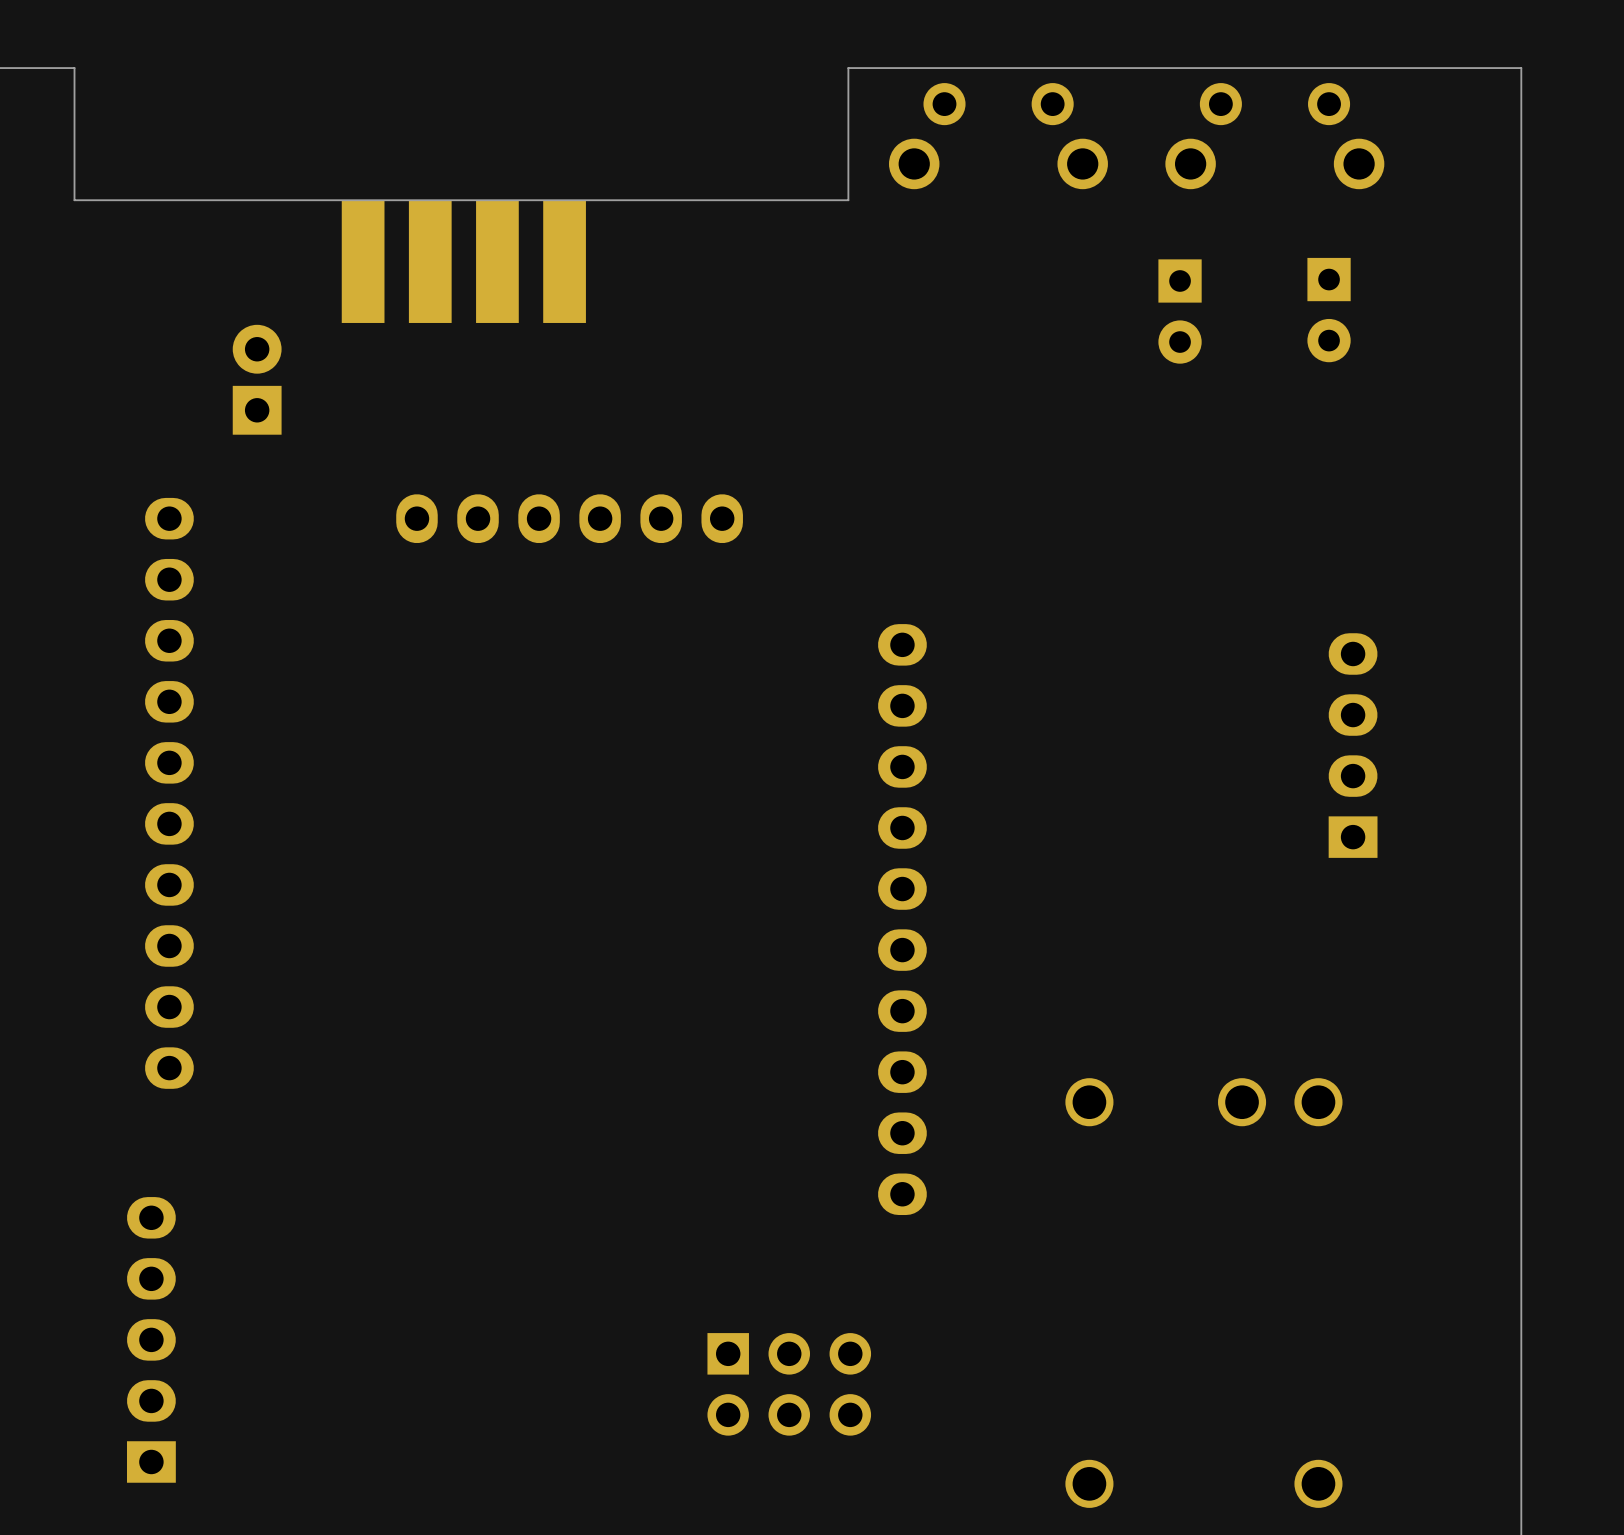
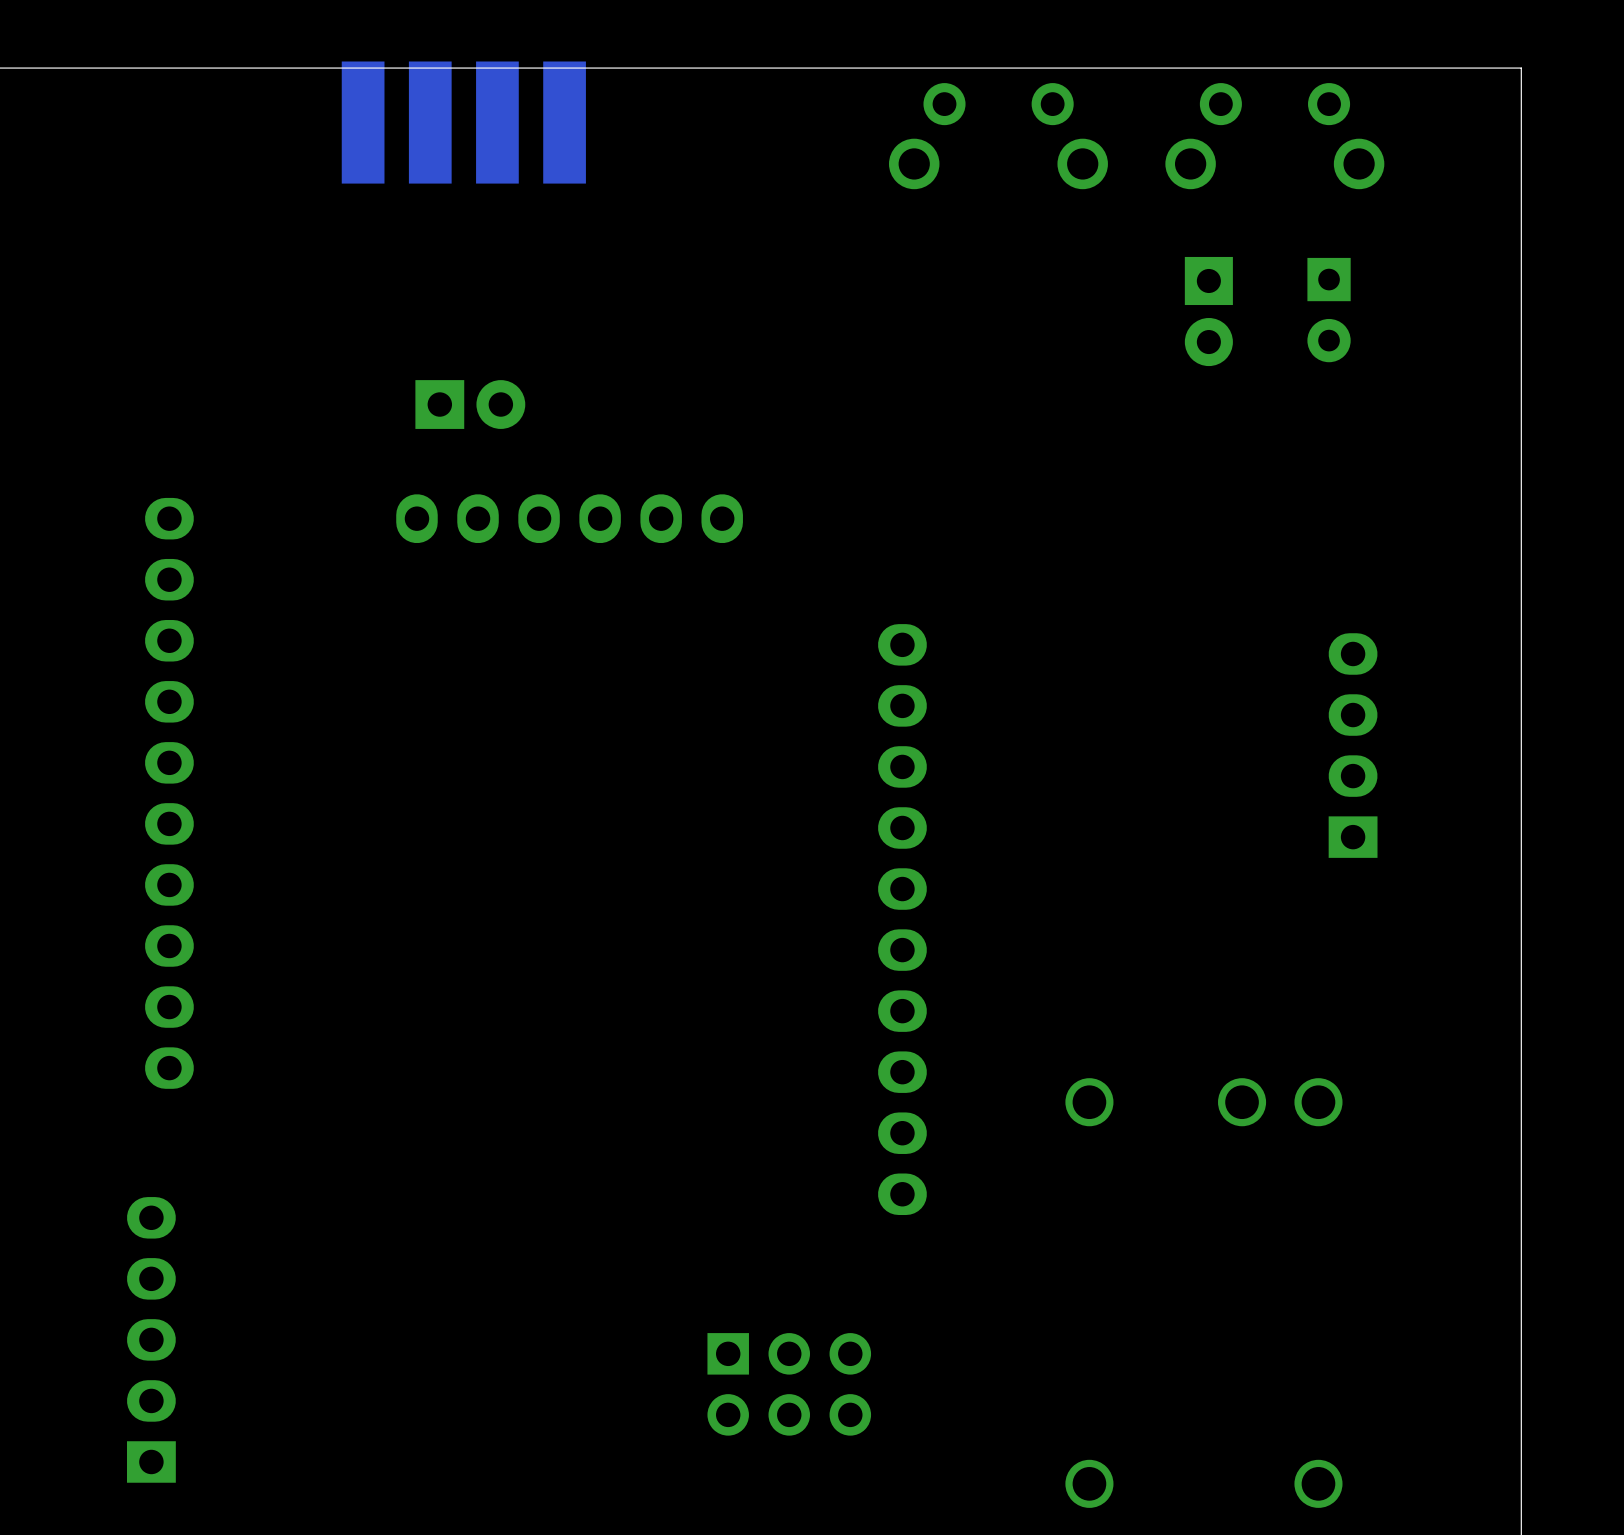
board edge: (848, 68) (848, 200) (74, 200) (74, 68) -> (848, 68) (74, 68)
part position: (463, 261) -> (463, 122)
part: (1180, 311) -> none
part: none -> (1208, 311)
part rotation: 0° (257, 379) -> 90° clockwise (470, 404)
part position: (257, 379) -> (470, 404)

